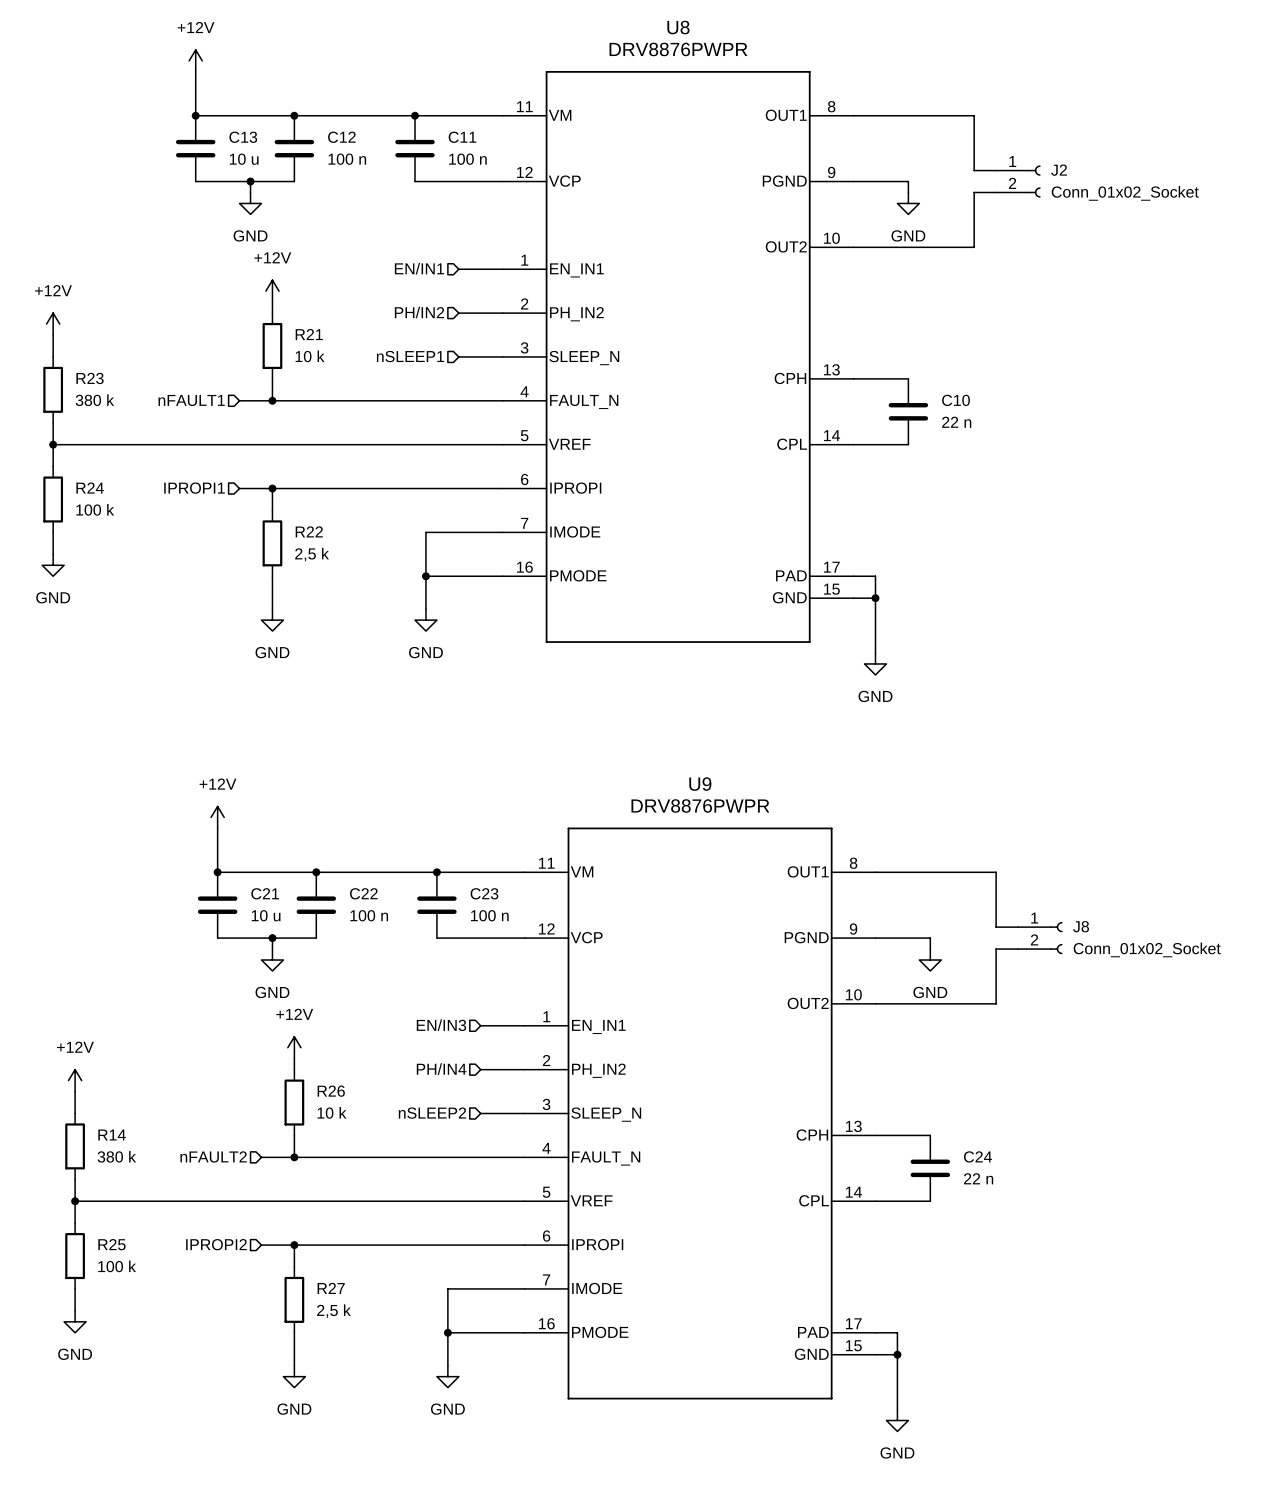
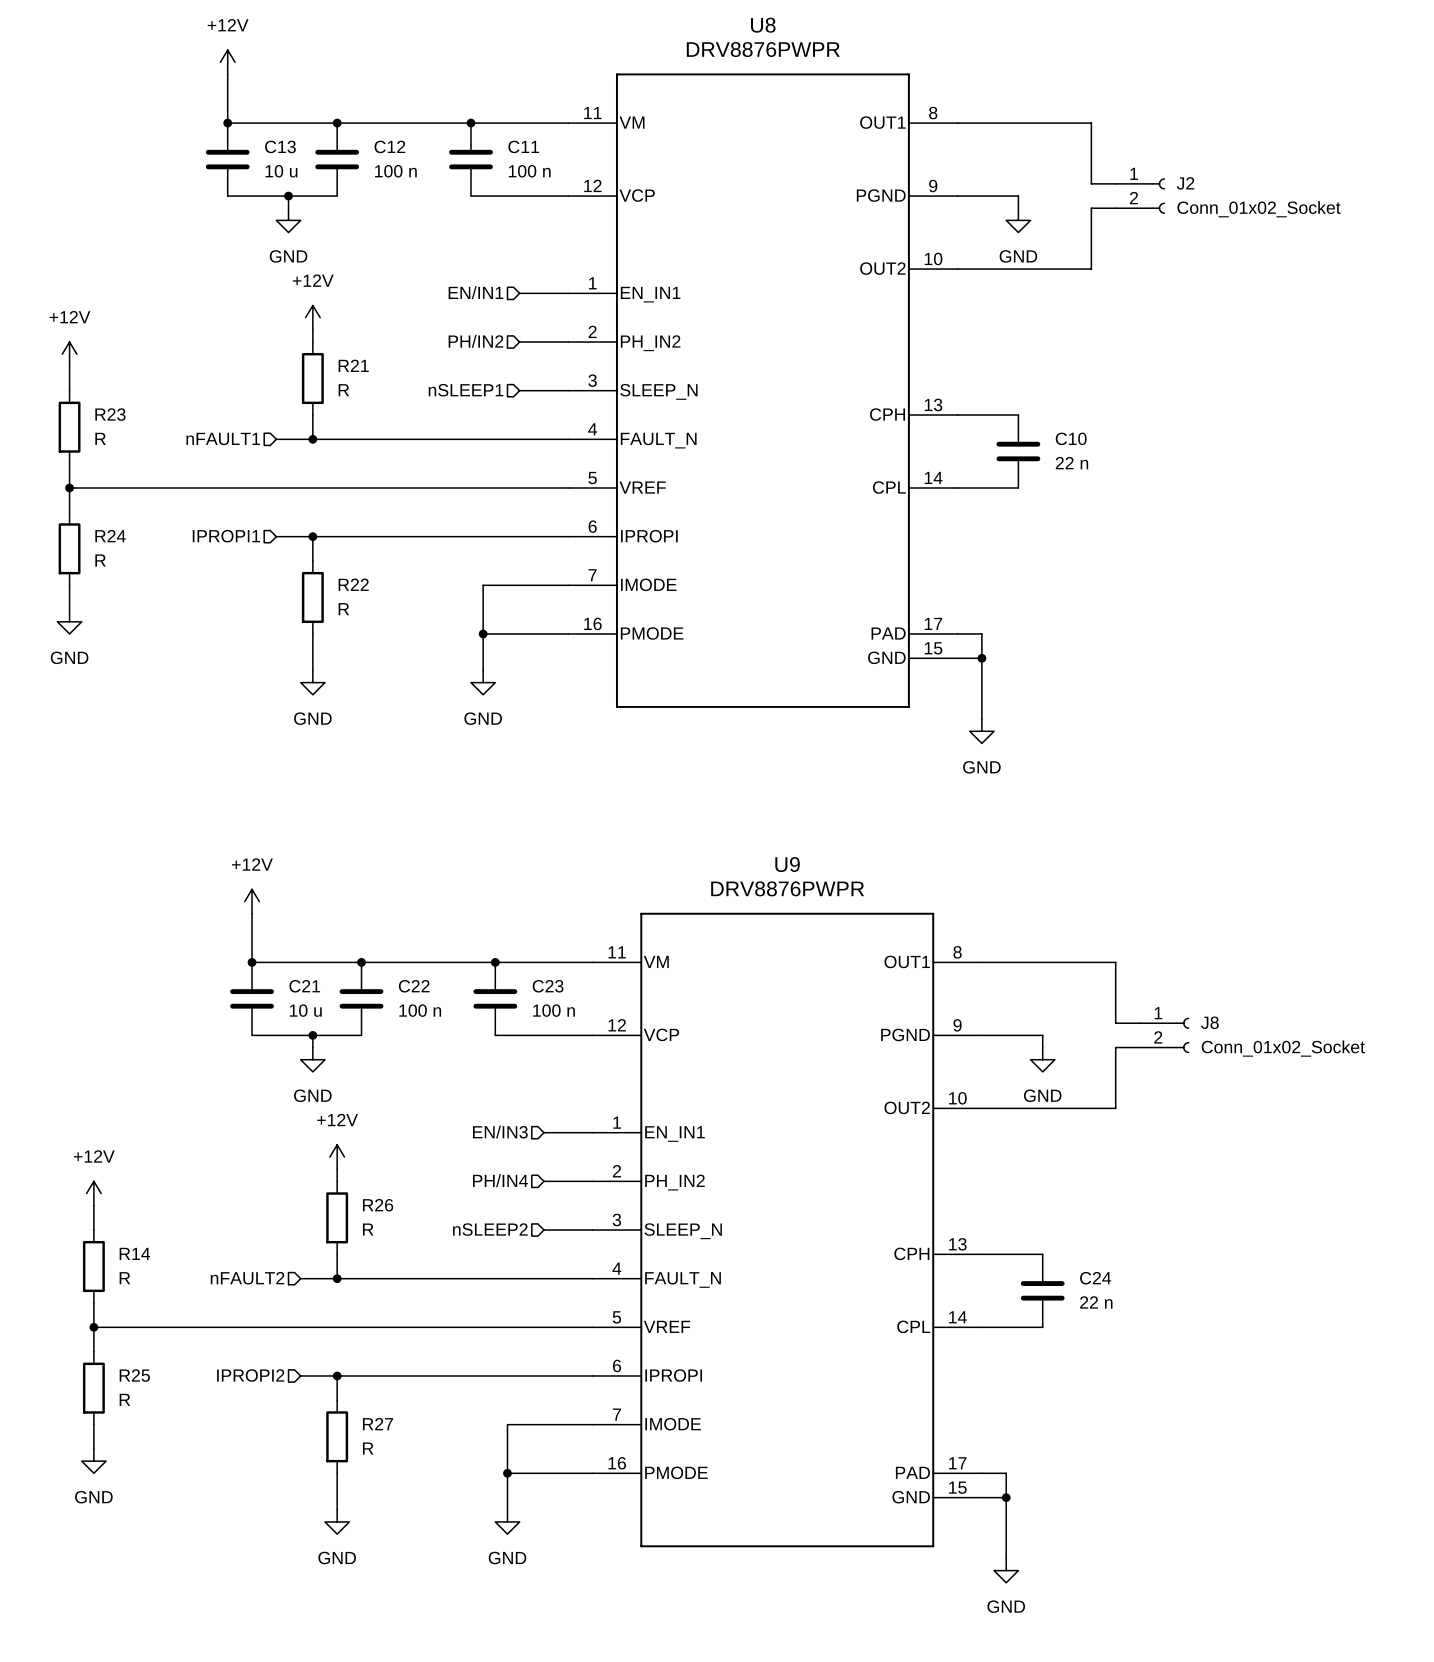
R21 value: 10 k (310, 356) -> R (343, 390)
R23 value: 380 k (94, 400) -> R (100, 438)
R24 value: 100 k (95, 509) -> R (100, 560)
R22 value: 2,5 k (312, 554) -> R (343, 609)
R26 value: 10 k (331, 1112) -> R (368, 1229)
R14 value: 380 k (116, 1156) -> R (124, 1278)
R25 value: 100 k (117, 1266) -> R (124, 1399)
R27 value: 2,5 k (334, 1311) -> R (368, 1448)

